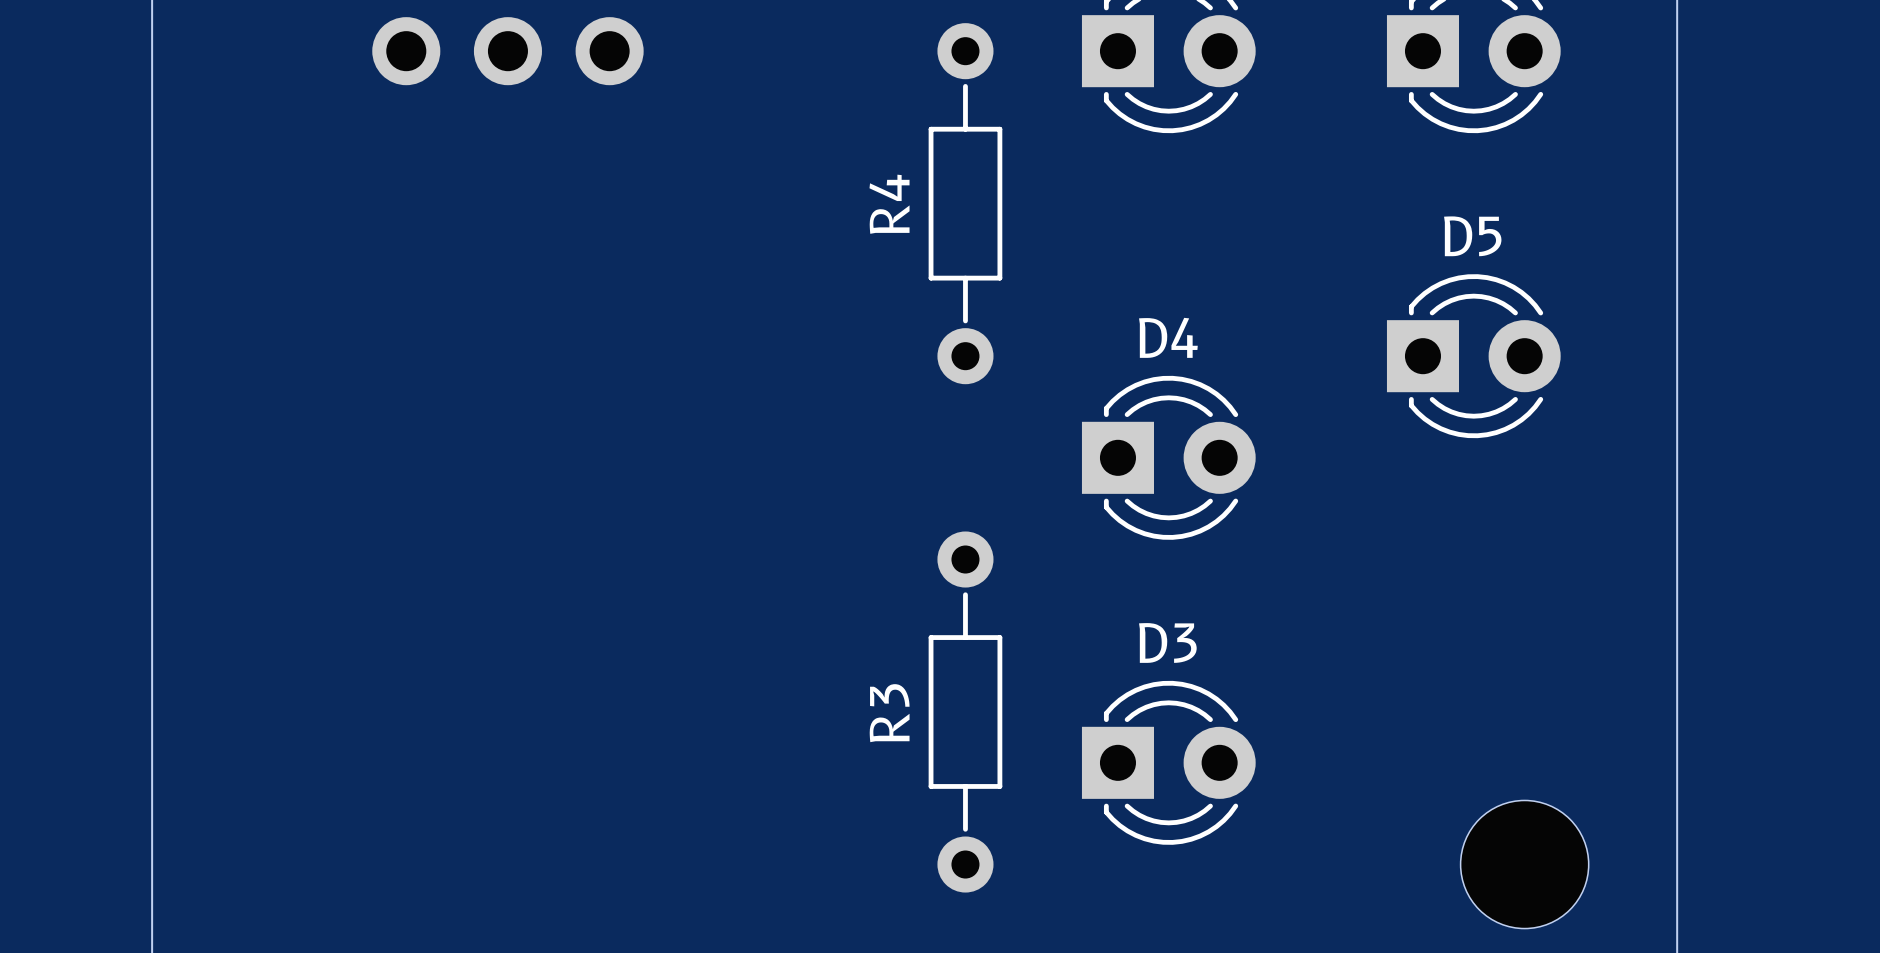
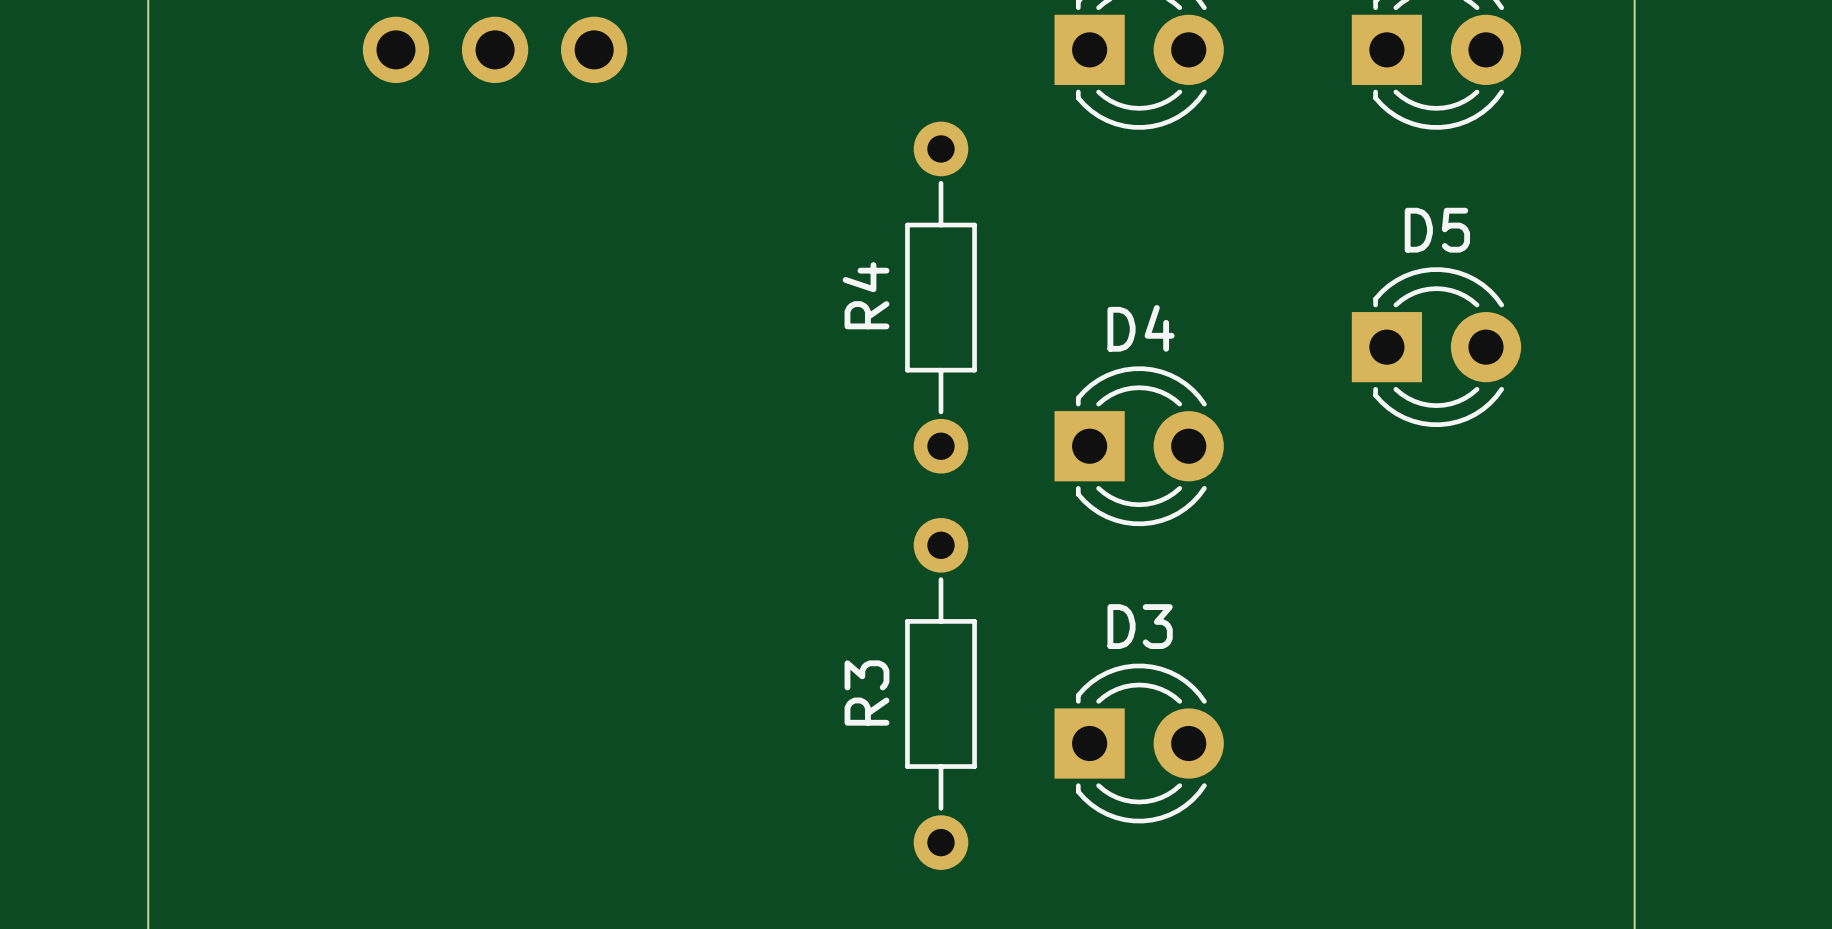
R4 position: (965, 203) -> (940, 297)
part: (1524, 864) -> none

